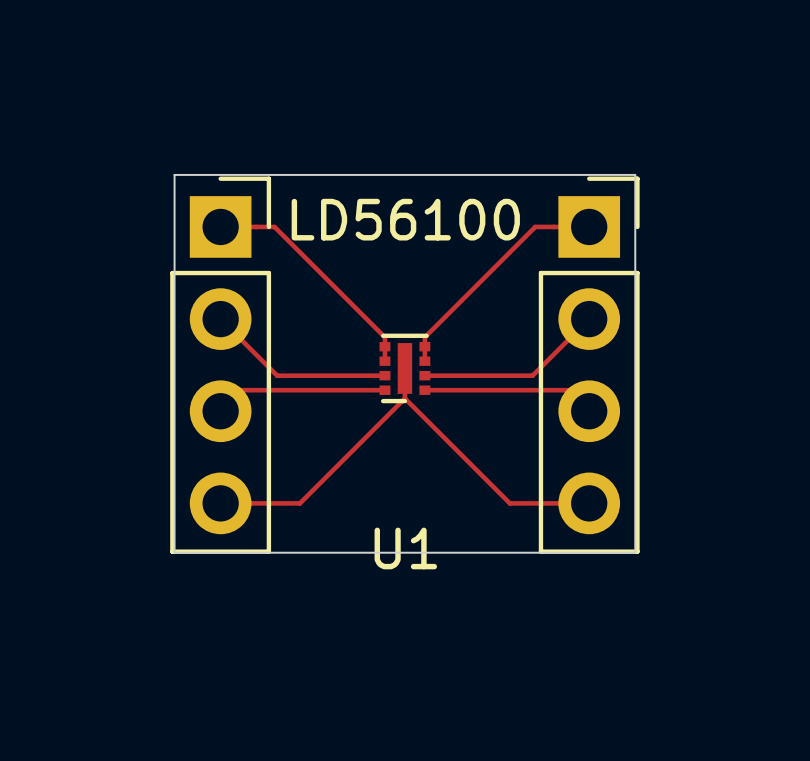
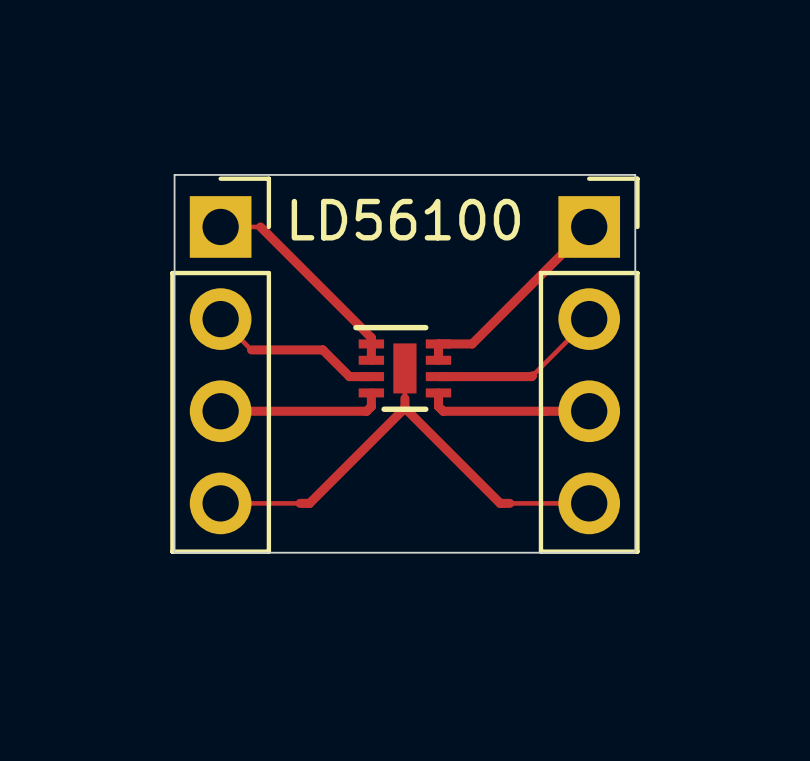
track: (260, 226) (274, 226) (384, 337) (384, 361) -> (260, 226) (371, 337) (371, 360)
track: (589, 226) (535, 226) (424, 337) (424, 361) -> (589, 226) (472, 343) (438, 343) (438, 360)
track: (251, 349) (277, 375) (384, 375) -> (251, 349) (322, 349) (349, 376) (371, 376)
part: none -> (402, 368)
U1: (404, 368) -> none
track: (424, 375) (532, 375) -> (438, 376) (532, 375)
track: (384, 390) (241, 390) (220, 411) -> (371, 392) (371, 406) (366, 411) (220, 411)
track: (424, 390) (568, 390) (589, 411) -> (438, 392) (438, 406) (443, 411) (589, 411)
track: none -> (404, 398) (404, 408)
track: none -> (404, 408) (500, 503) (509, 503)
track: (299, 503) (404, 398) (509, 503) -> (299, 503) (309, 503) (404, 408)

